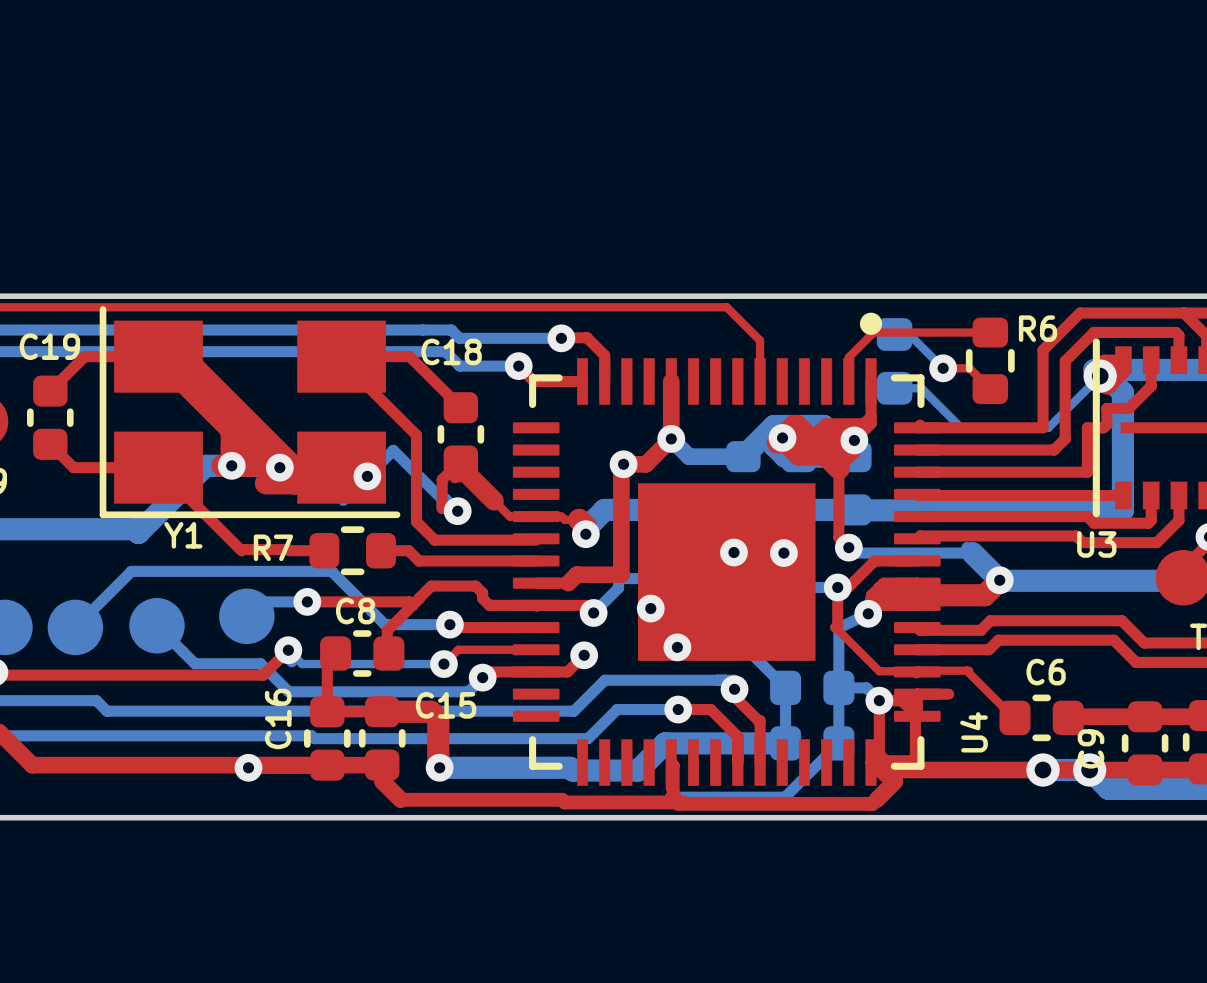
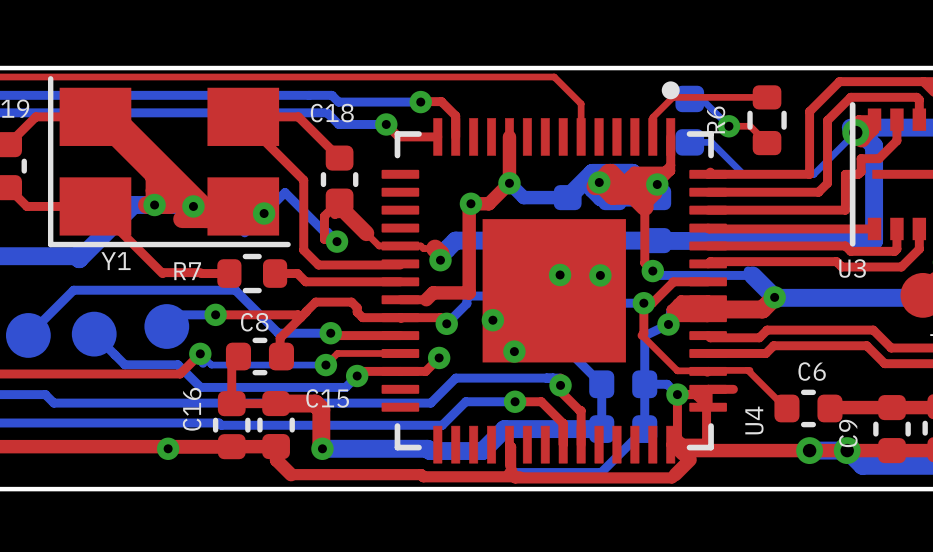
R6 name rotation: 0° (1038, 328) -> 90° counterclockwise (716, 119)
R6 name position: R6 (1038, 328) -> R6 (716, 119)

